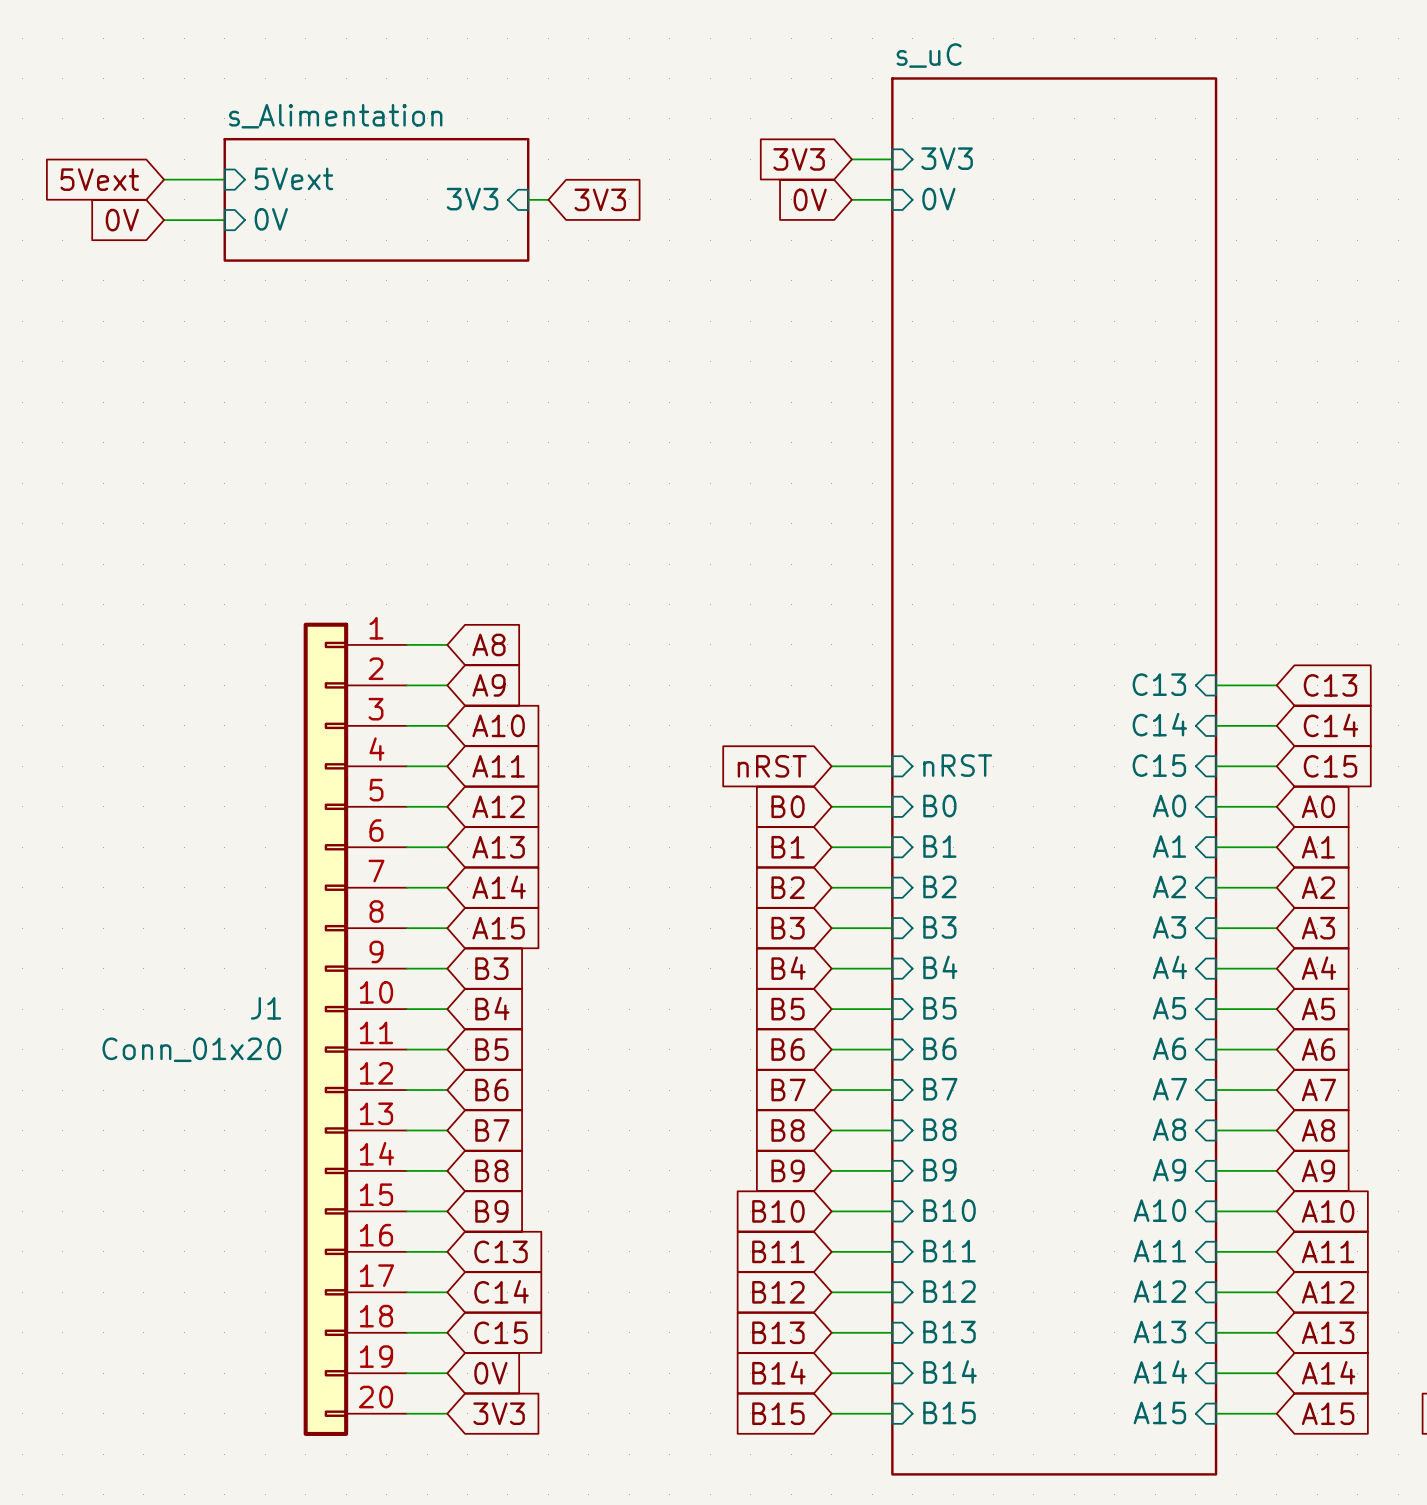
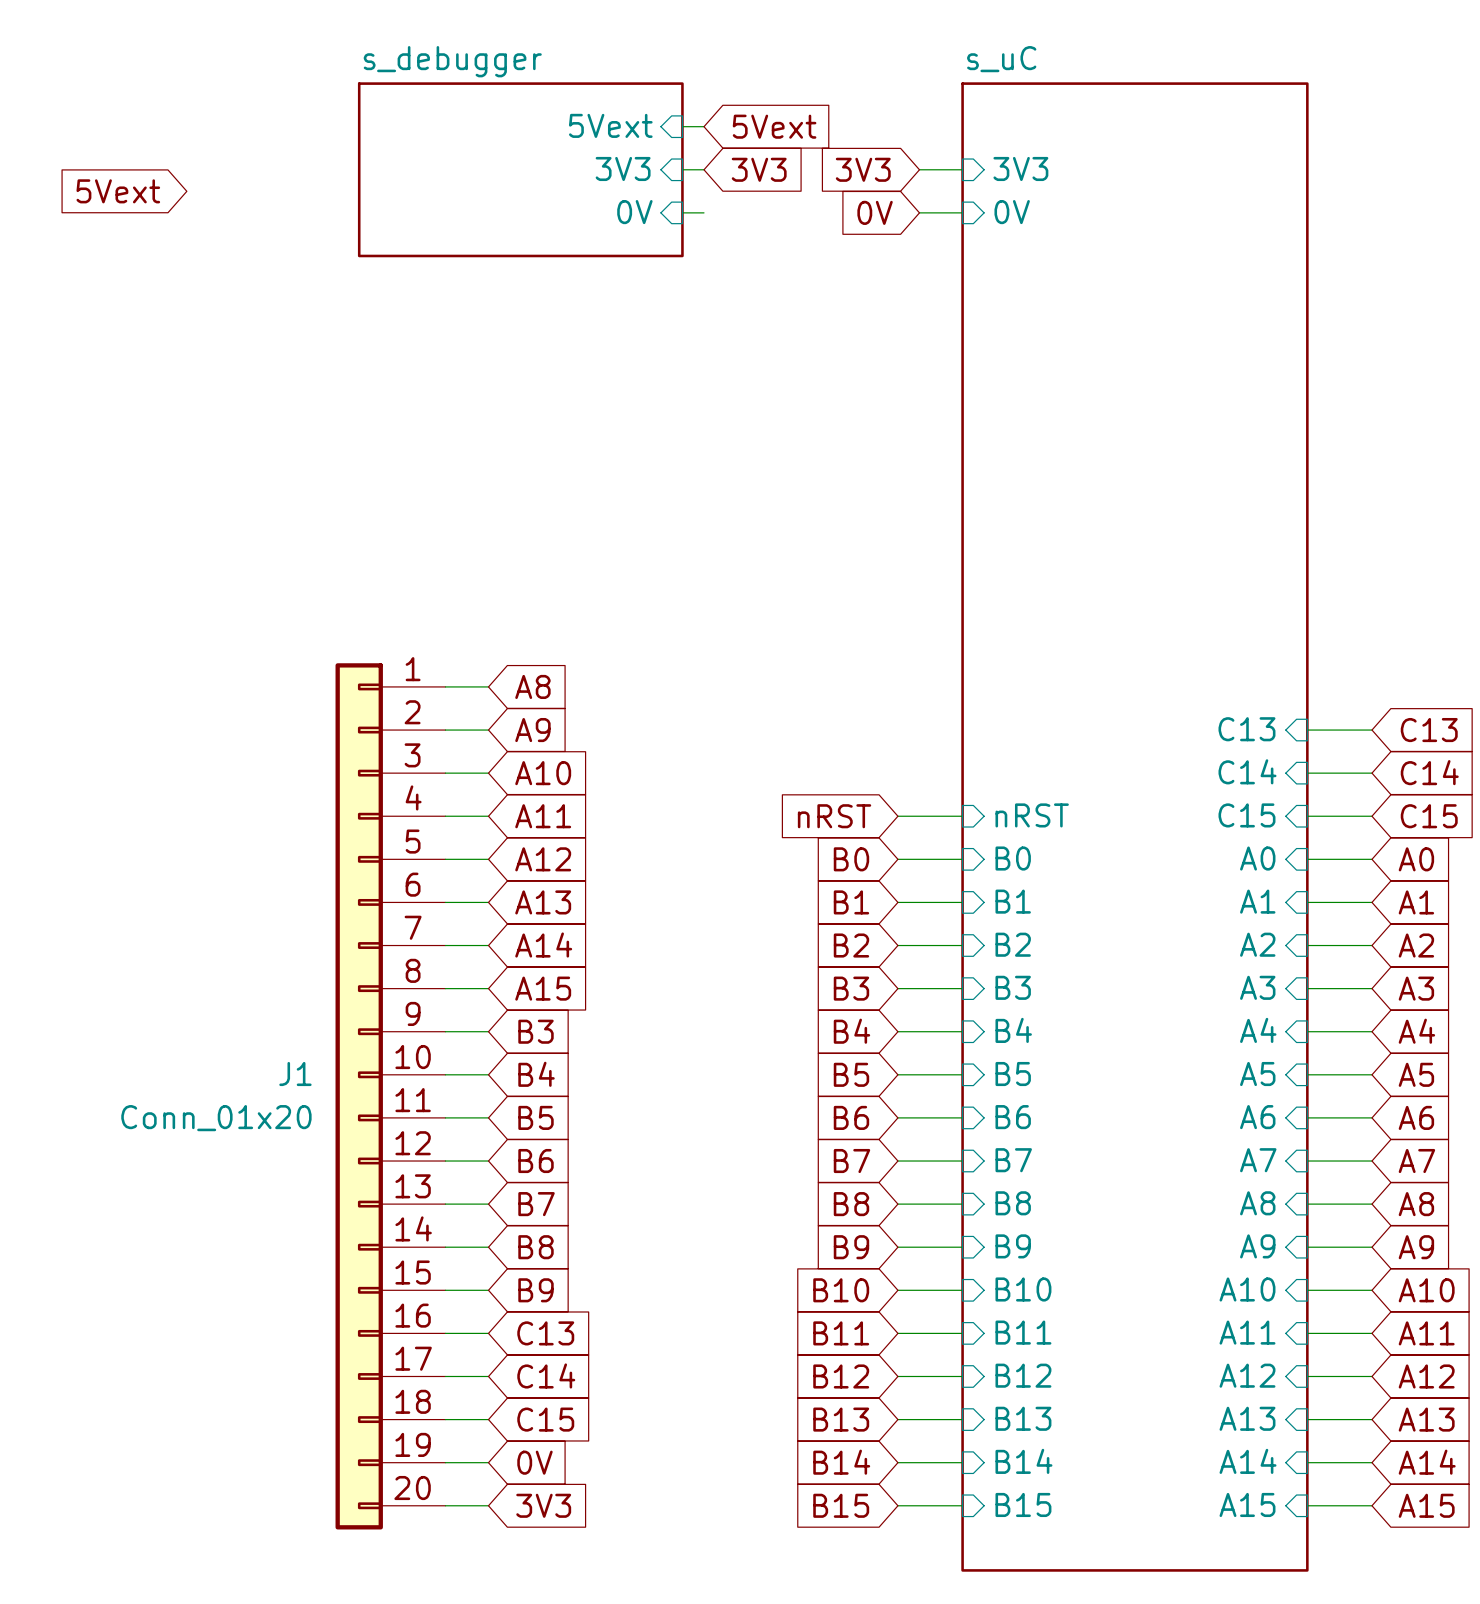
wire: none -> (682, 126) (703, 126)
global label: none -> 5Vext (774, 126)
sheet s_debugger: none -> (520, 169)
wire: none -> (682, 169) (703, 169)
sheet pin rotation: 0° (293, 178) -> 180° (610, 125)
sheet pin position: 5Vext (293, 178) -> 5Vext (610, 125)
wire: (164, 179) (224, 179) -> none
sheet s_Alimentation: (376, 199) -> none
sheet pin position: 3V3 (472, 199) -> 3V3 (623, 168)
wire: (528, 199) (548, 199) -> (682, 212) (703, 212)
global label position: 3V3 (600, 199) -> 3V3 (759, 169)
sheet pin rotation: 0° (271, 219) -> 180° (634, 212)
sheet pin position: 0V (271, 219) -> 0V (634, 212)
global label: 0V (122, 220) -> none
wire: (164, 220) (224, 220) -> none

